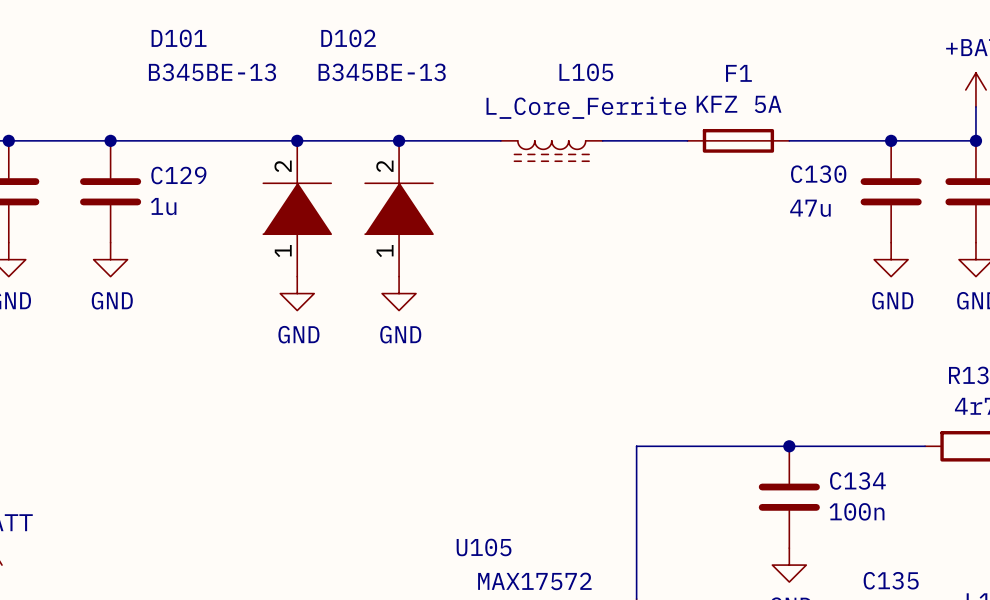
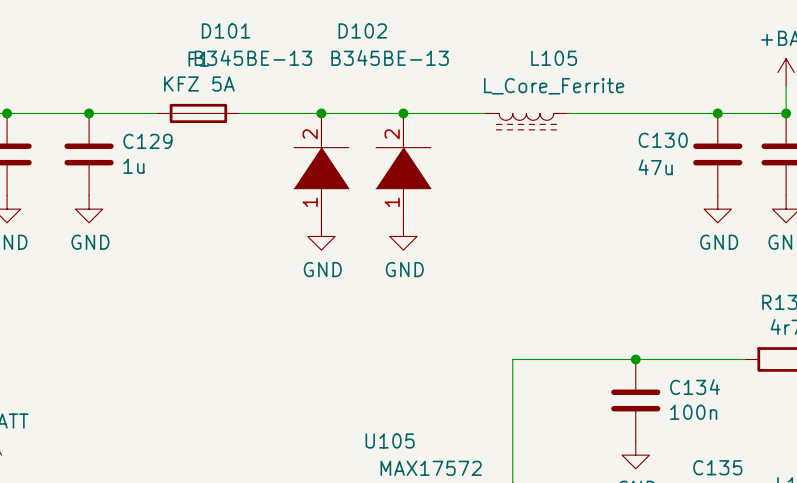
D102 name: D102 (348, 38) -> D101 (226, 30)
D102 value position: B345BE-13 (382, 72) -> B345BE-13 (253, 57)
junction: (297, 140) -> none
junction: none -> (403, 113)
wire: (602, 140) (687, 140) -> (485, 113) (403, 113)
F1 position: (738, 140) -> (198, 113)
L105 position: (551, 151) -> (526, 121)
D101: B345BE-13 (297, 208) -> none
D102: none -> B345BE-13 (403, 168)
power symbol position: GND (297, 293) -> GND (403, 236)

